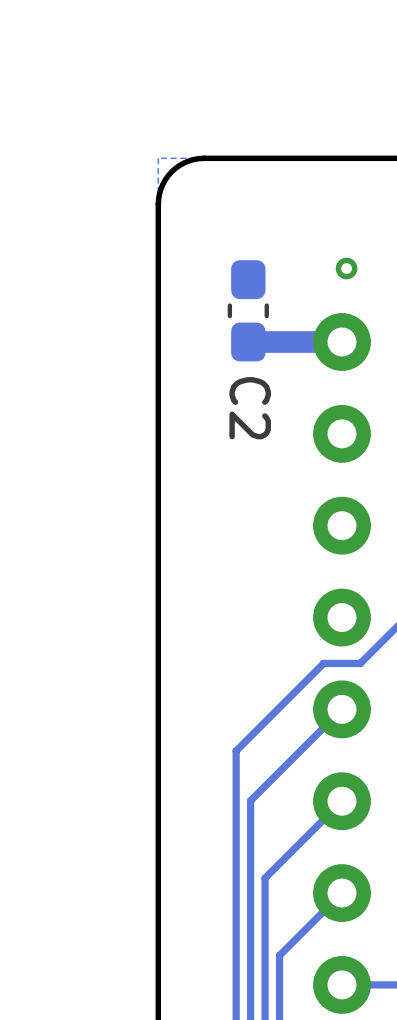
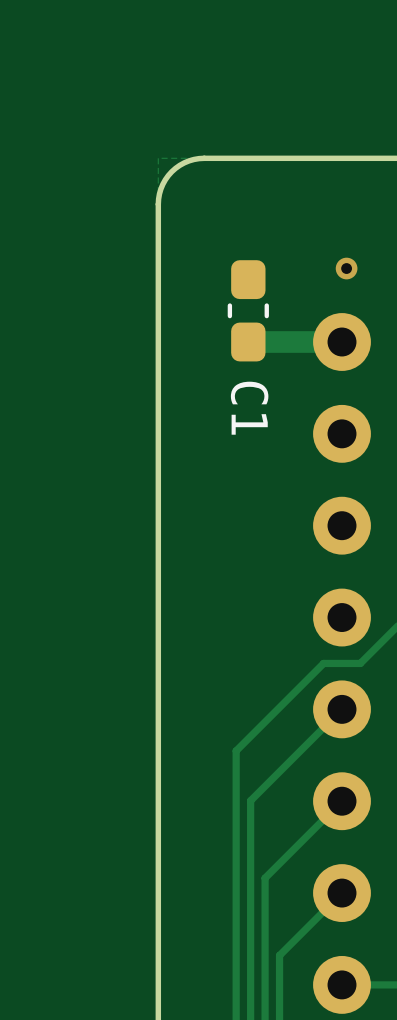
C2 name: C2 (250, 408) -> C1 (249, 408)

